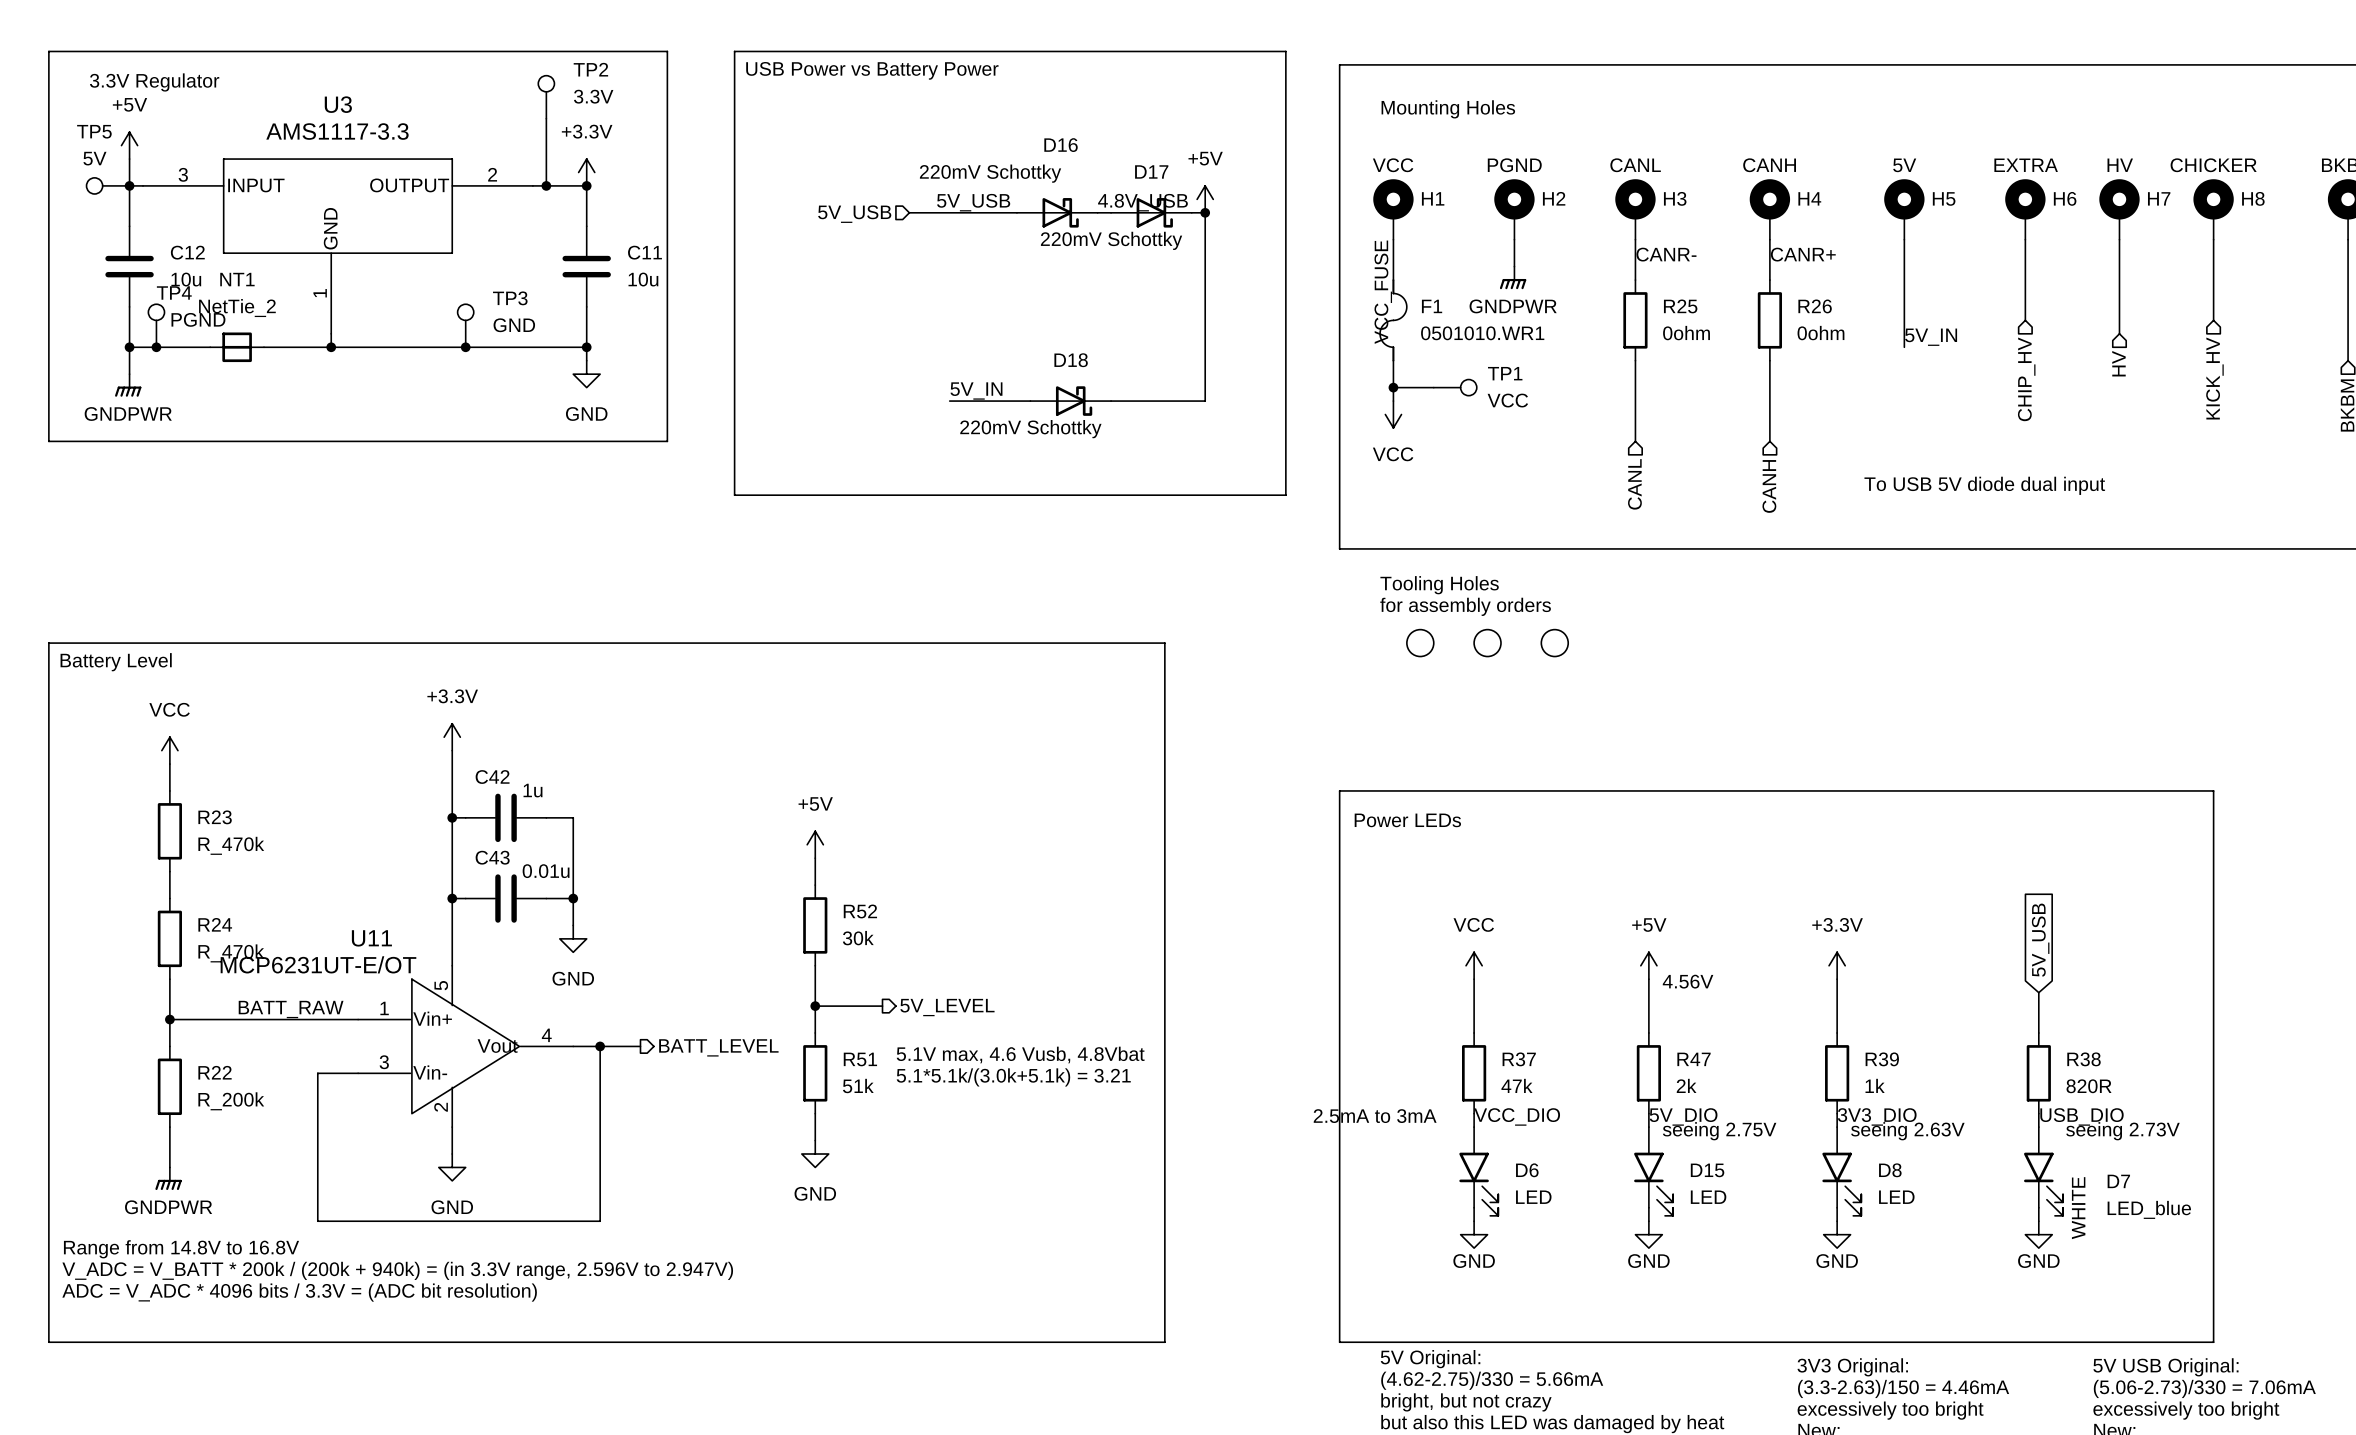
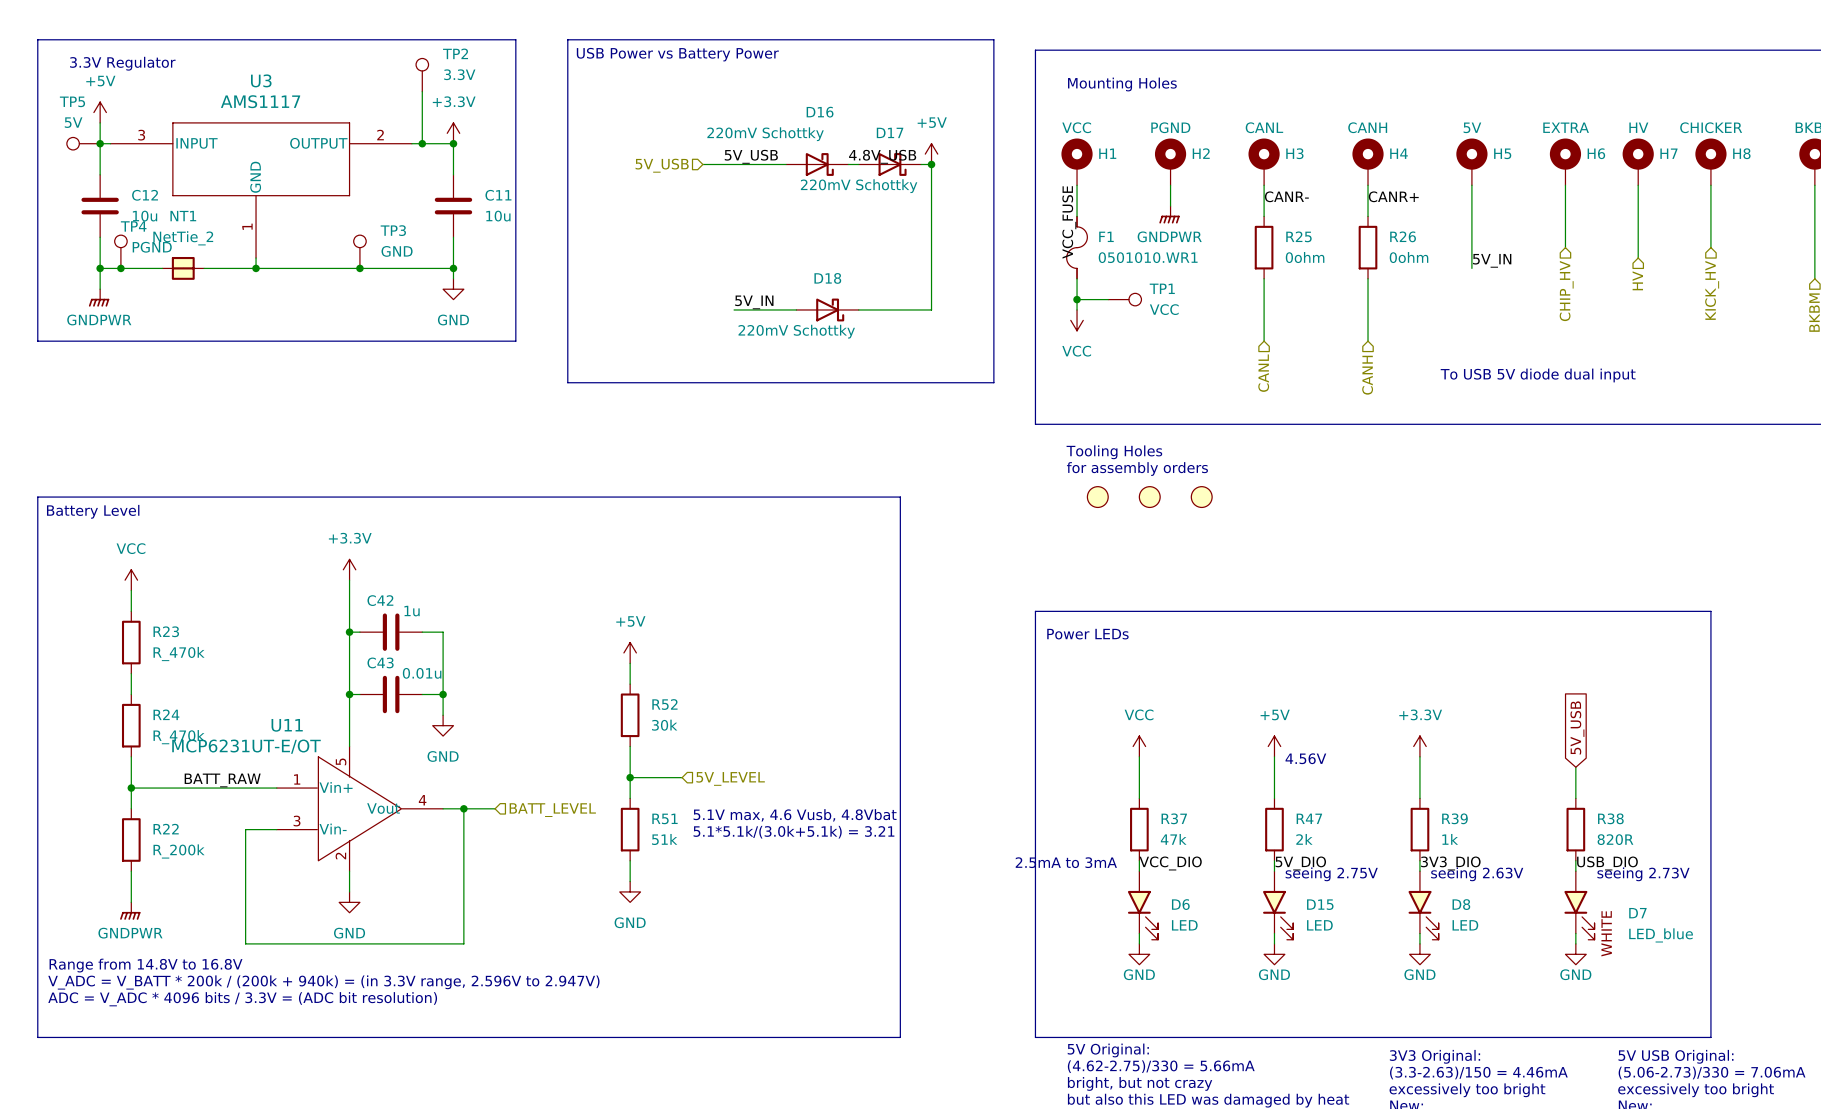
U3 value: AMS1117-3.3 (337, 131) -> AMS1117 (260, 101)
hierarchical label shape: output (947, 1007) -> input (730, 778)
hierarchical label shape: output (718, 1047) -> input (552, 810)

